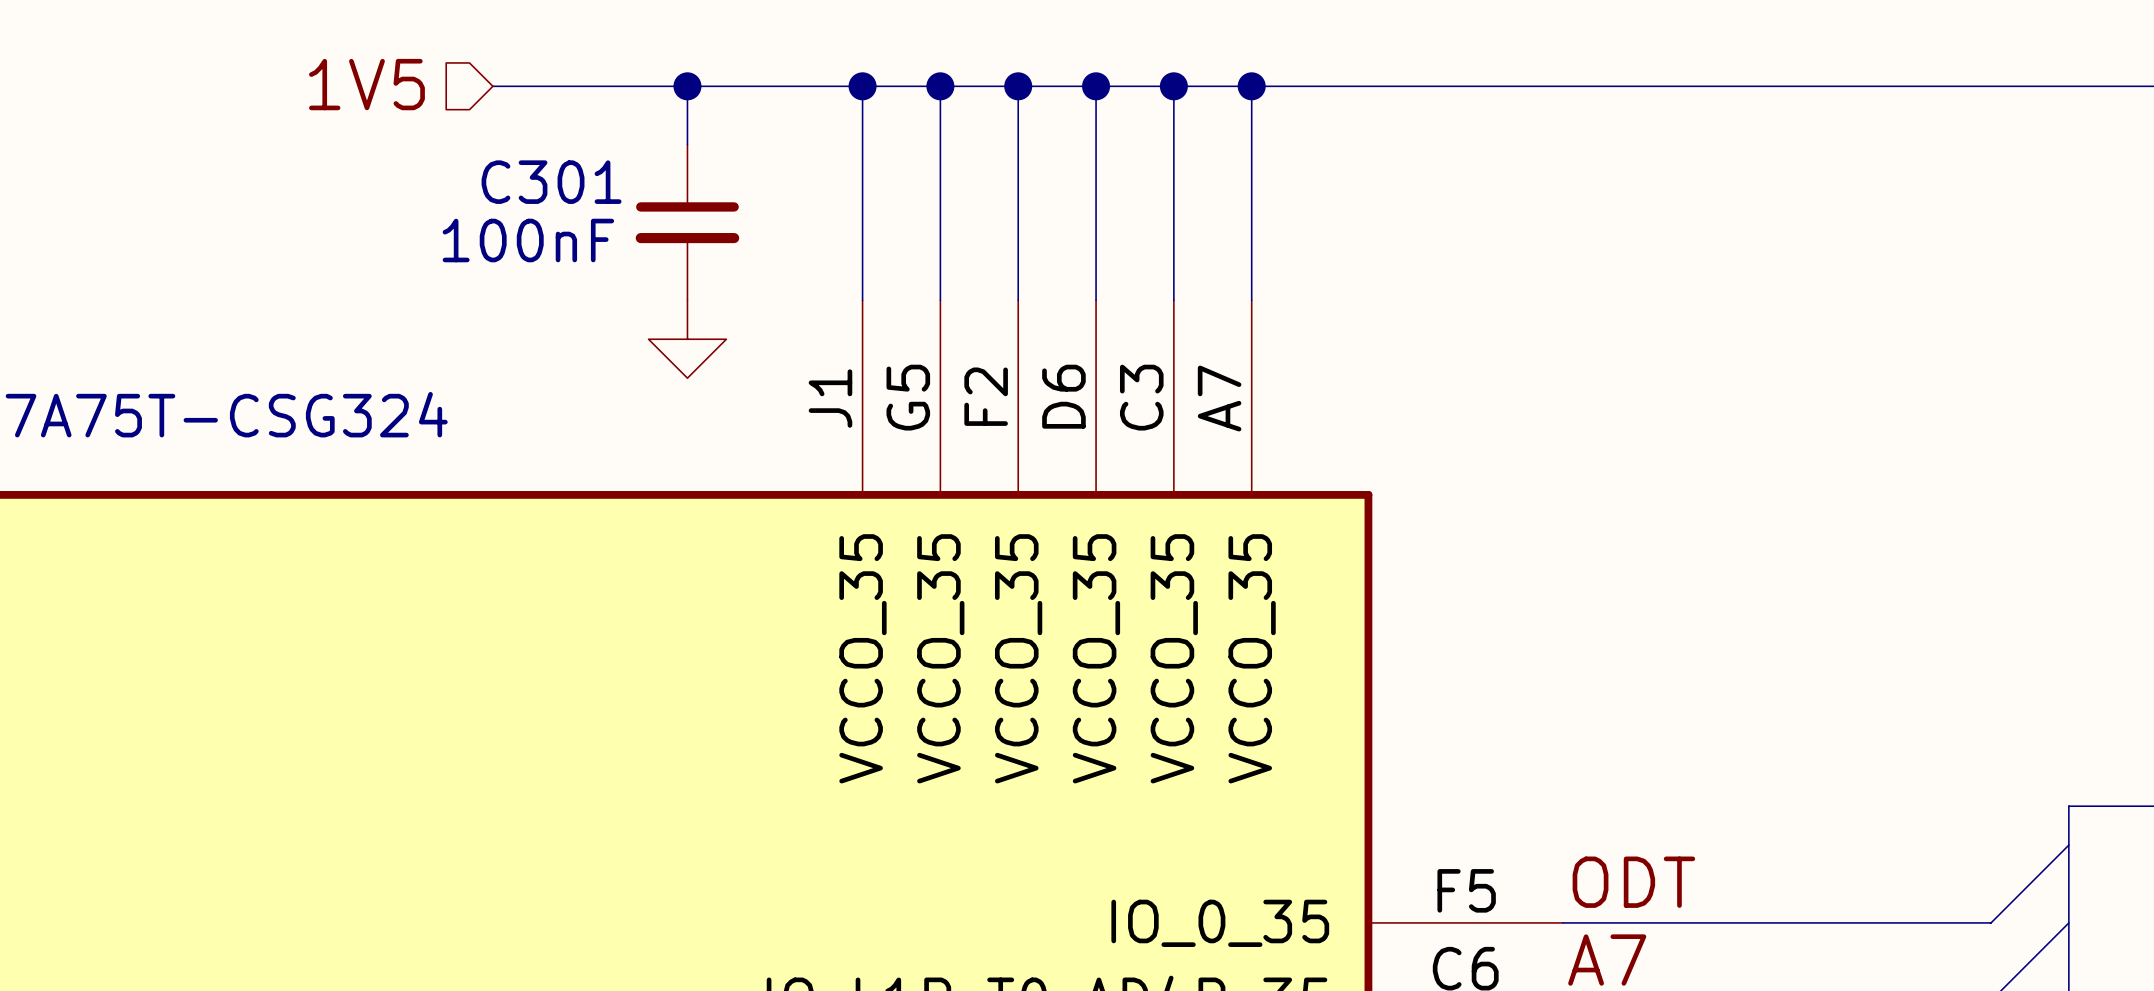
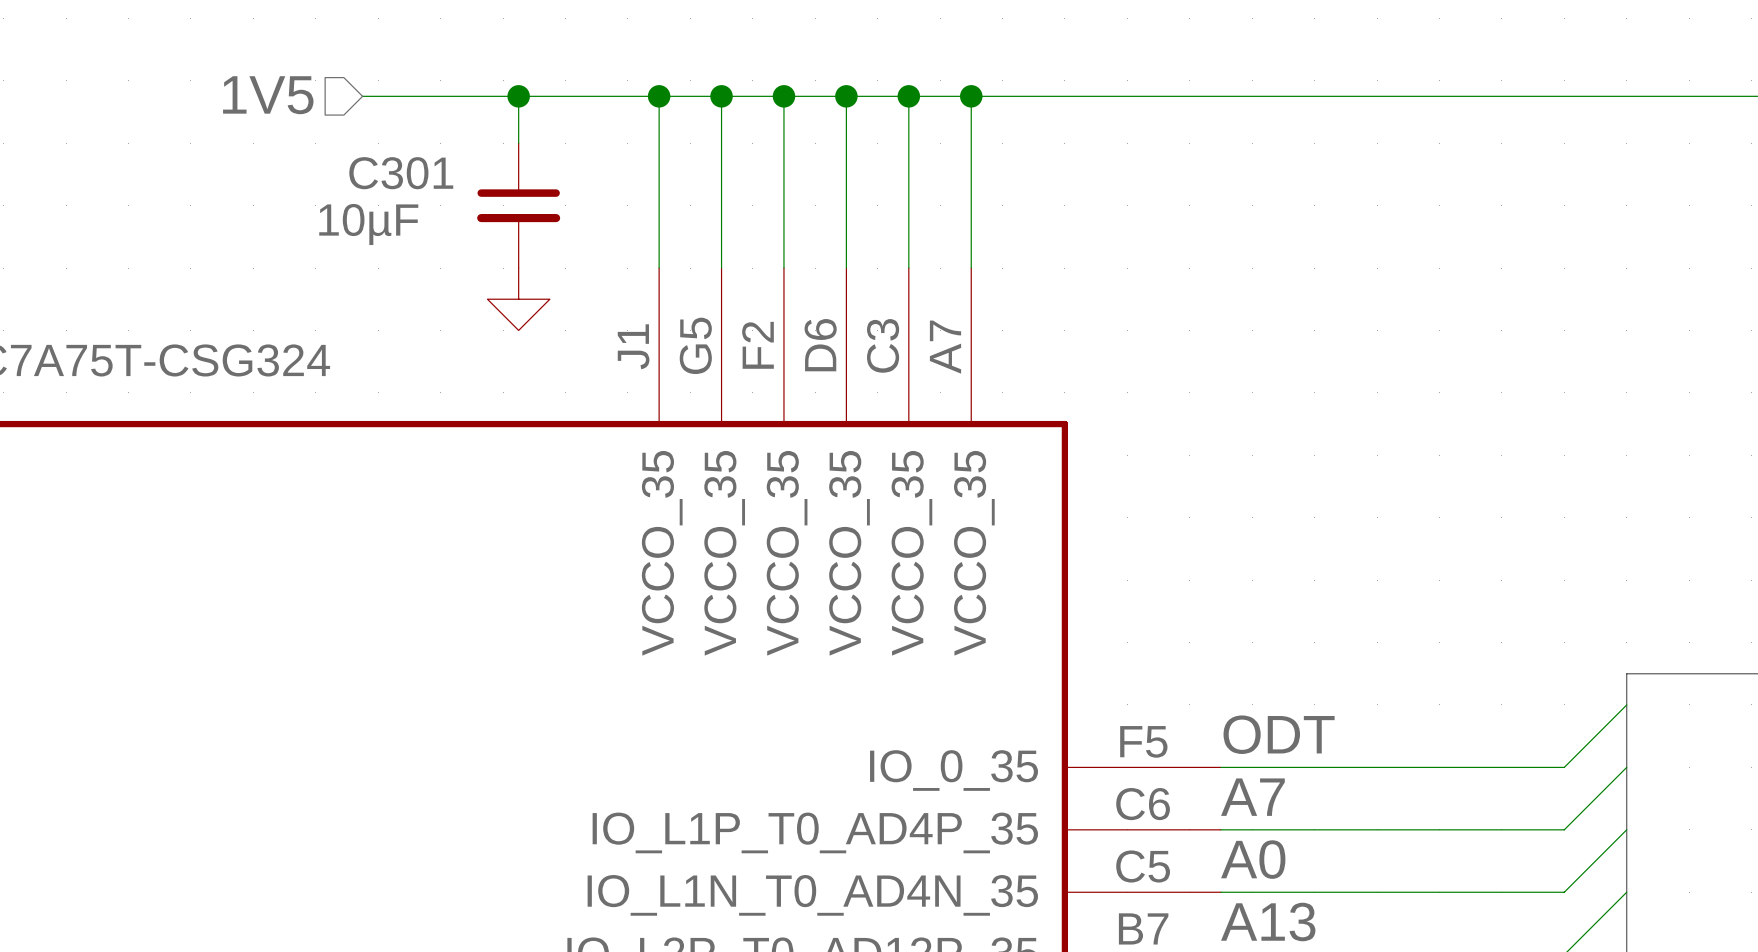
C301 value: 100nF (528, 240) -> 10µF (368, 224)

